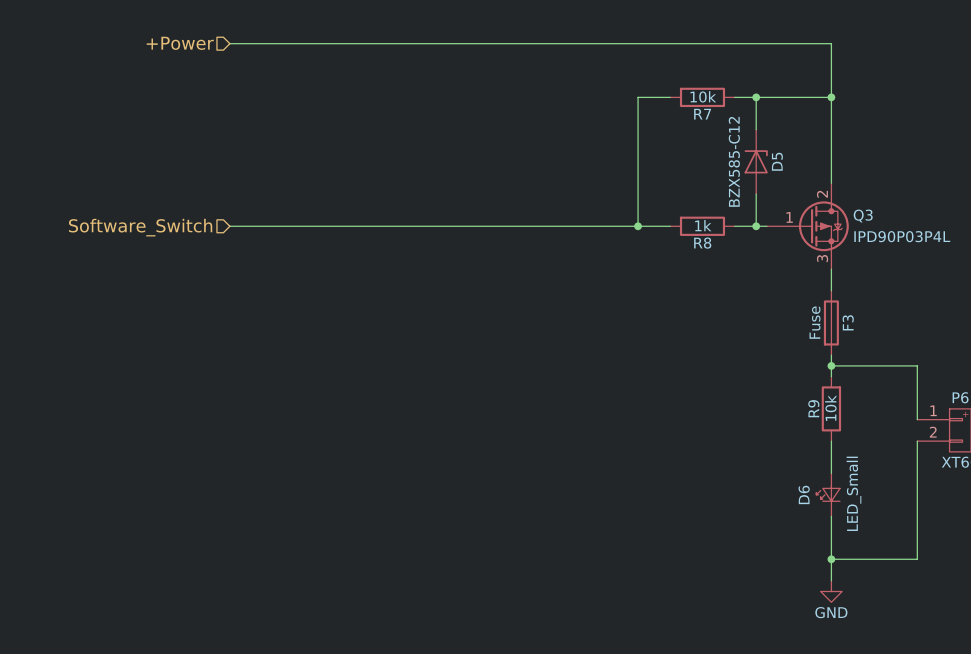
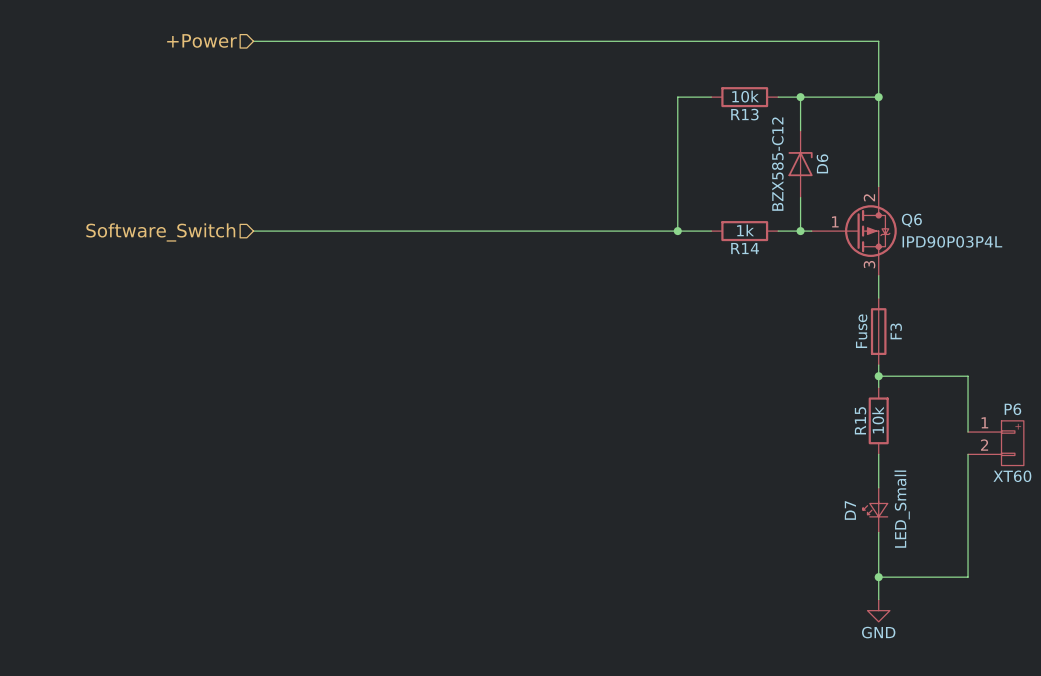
R7 name: R7 (702, 114) -> R13 (744, 114)
D5 name: D5 (777, 161) -> D6 (822, 163)
Q3 name: Q3 (863, 216) -> Q6 (911, 220)
R8 name: R8 (702, 243) -> R14 (745, 248)
R9 name: R9 (813, 408) -> R15 (860, 420)
D6 name: D6 (804, 494) -> D7 (850, 510)

